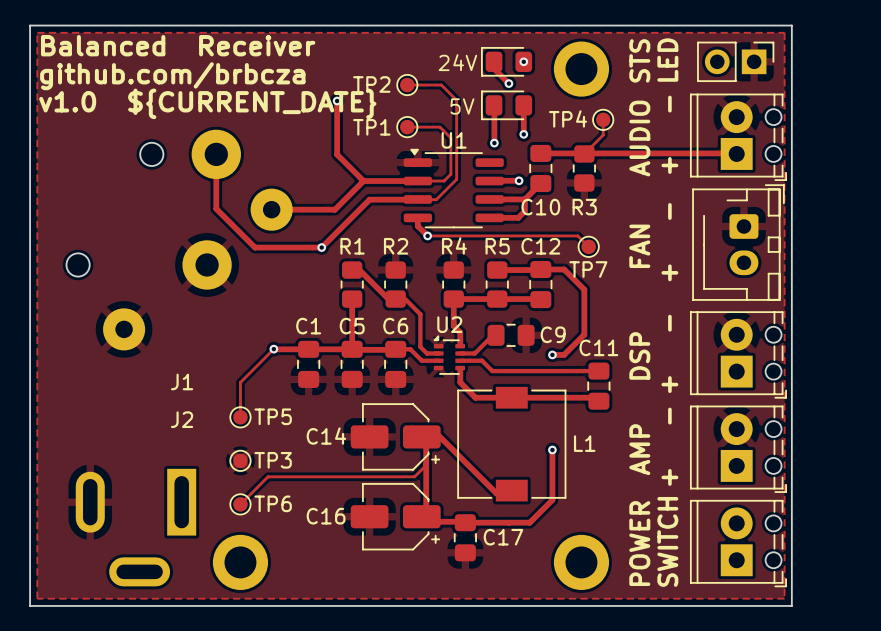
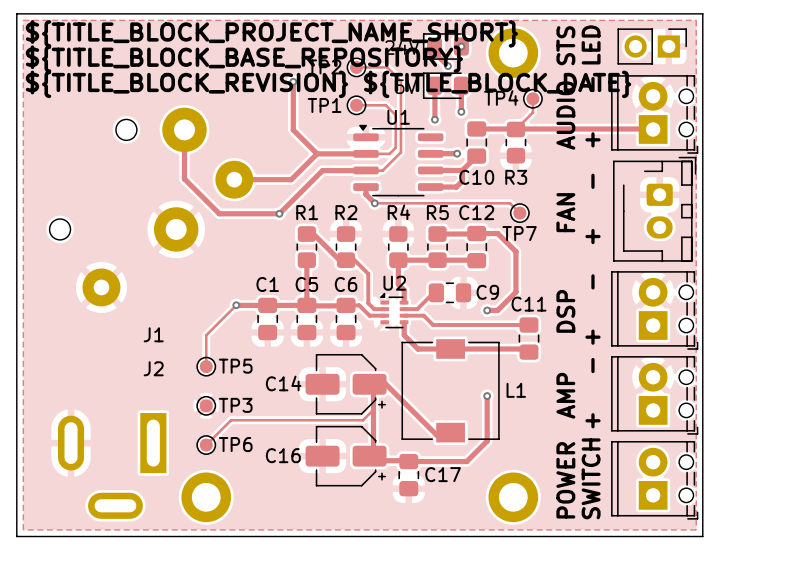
text: Balanced Receiver (178, 45) -> ${TITLE_BLOCK_PROJECT_NAME_SHORT} (271, 33)
text: github.com/brbcza (172, 76) -> ${TITLE_BLOCK_BASE_REPOSITORY} (244, 59)
text: v1.0 ${CURRENT_DATE} (207, 103) -> ${TITLE_BLOCK_REVISION} ${TITLE_BLOCK_DATE} (328, 84)

